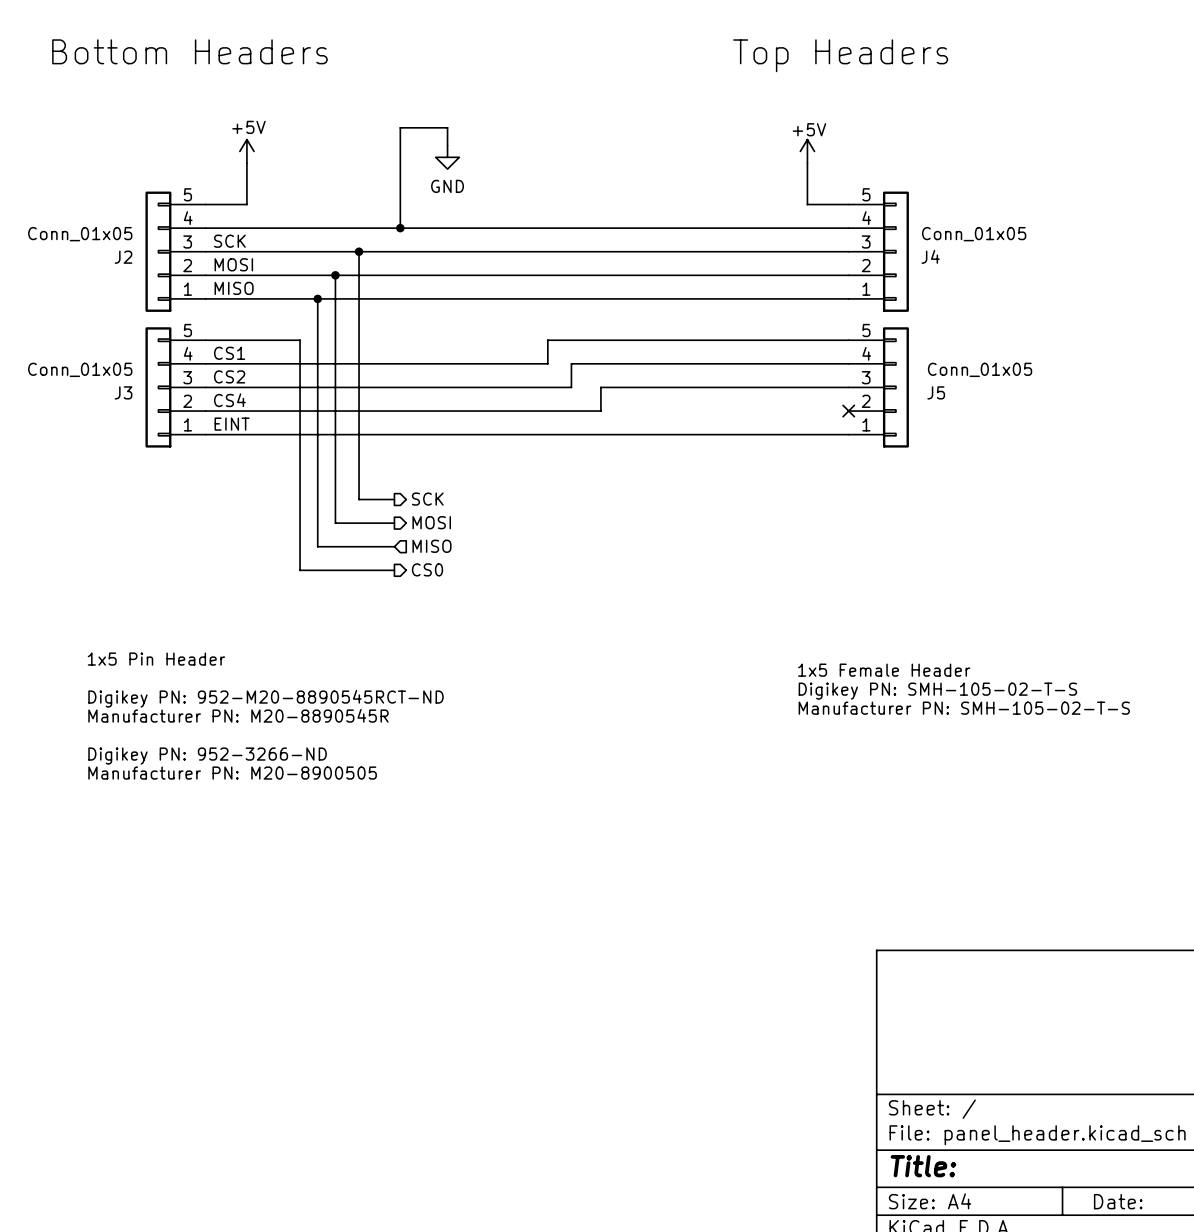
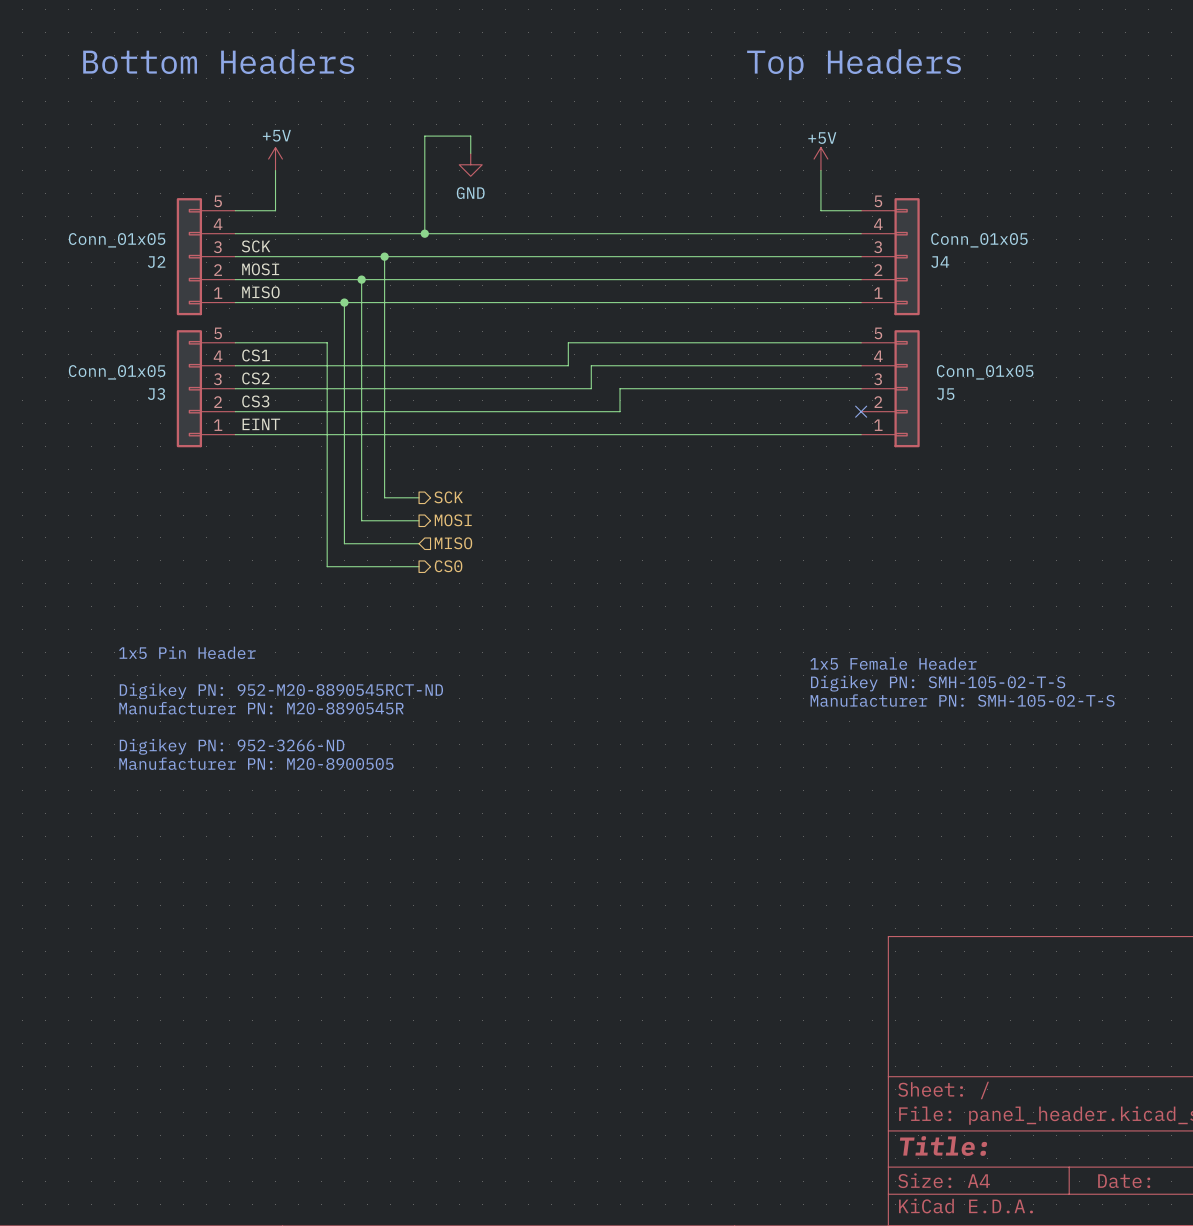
label: CS4 (229, 400) -> CS3 (255, 401)

